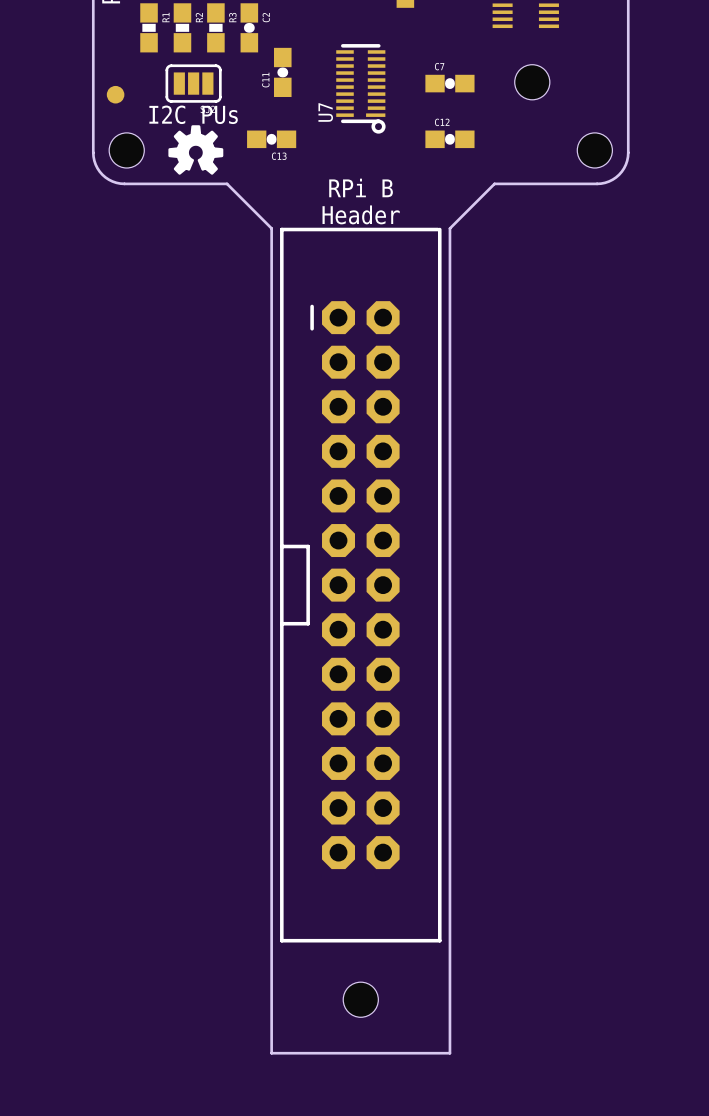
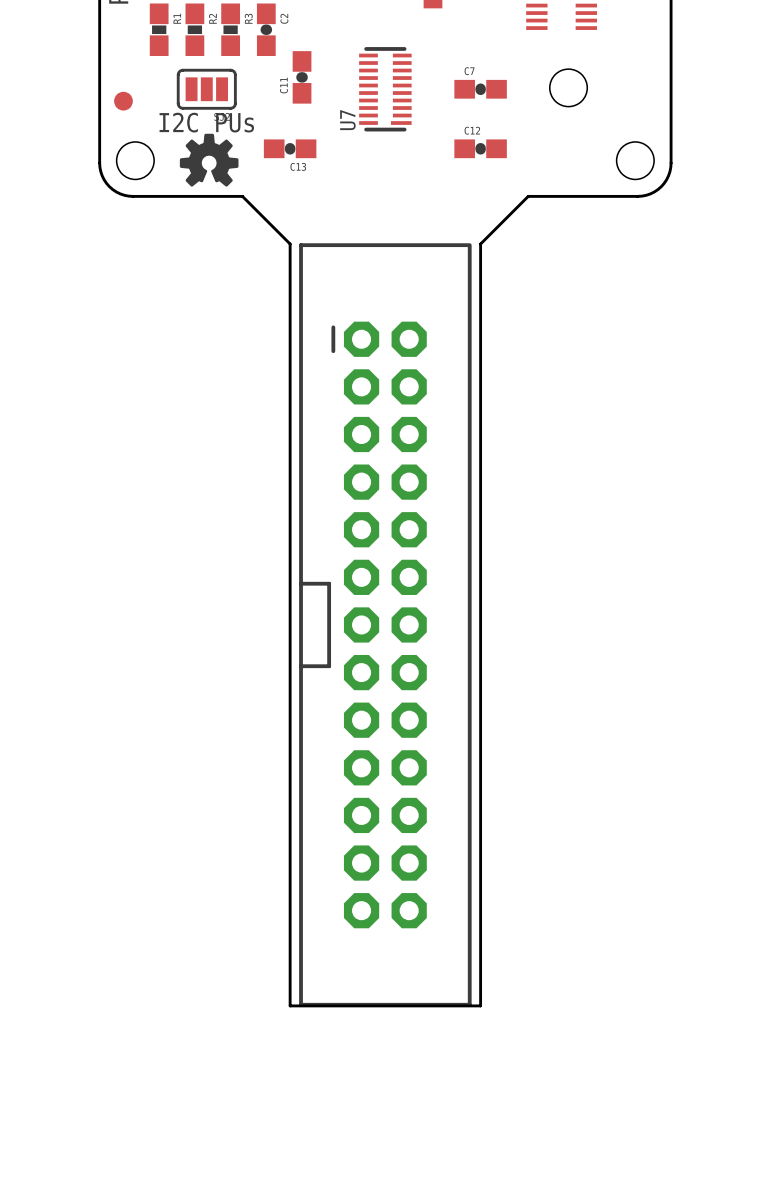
U7 footprint: [336, 44, 386, 134] -> [359, 47, 412, 132]
text: RPi B (361, 187) -> none
text: Header (361, 214) -> none
board edge: (271, 941) (271, 1053) (449, 1053) (449, 941) -> (290, 1005) (480, 1005)
hole: (360, 999) -> none

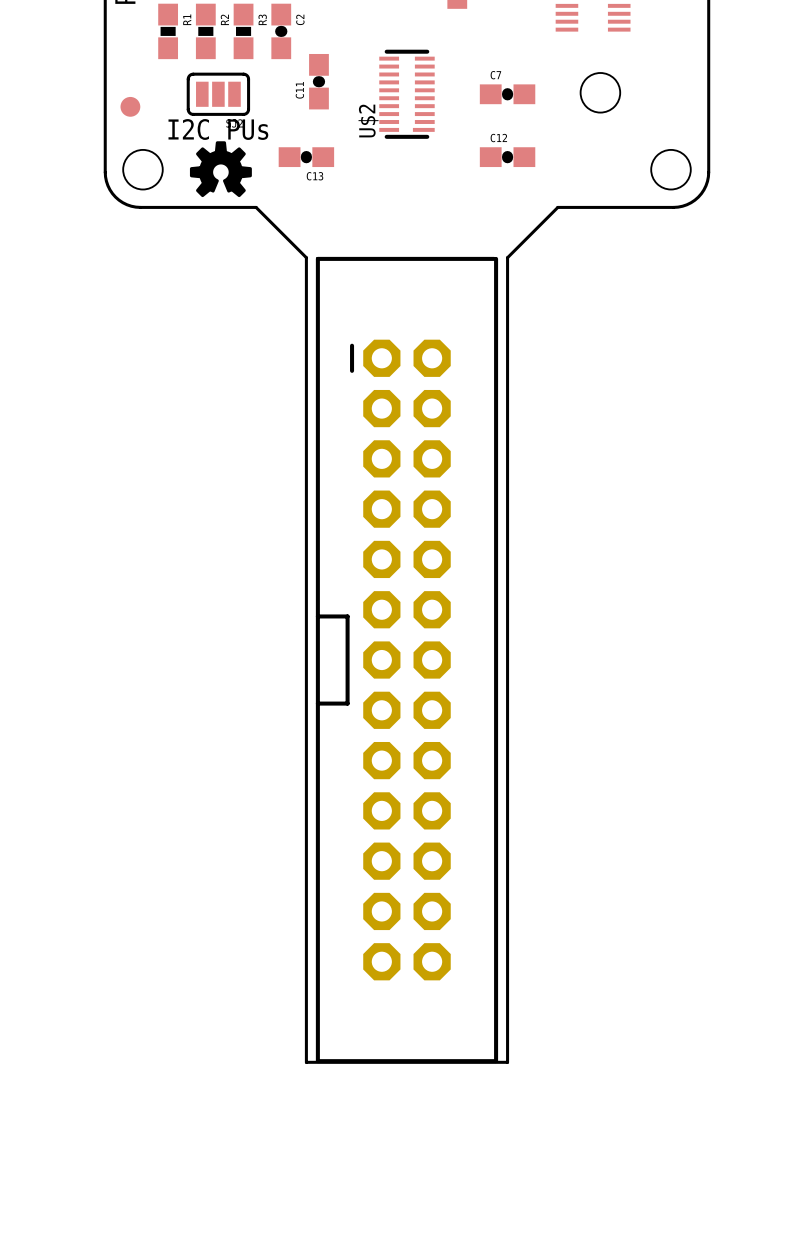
U7 name: U7 (347, 120) -> U$2 (368, 121)

